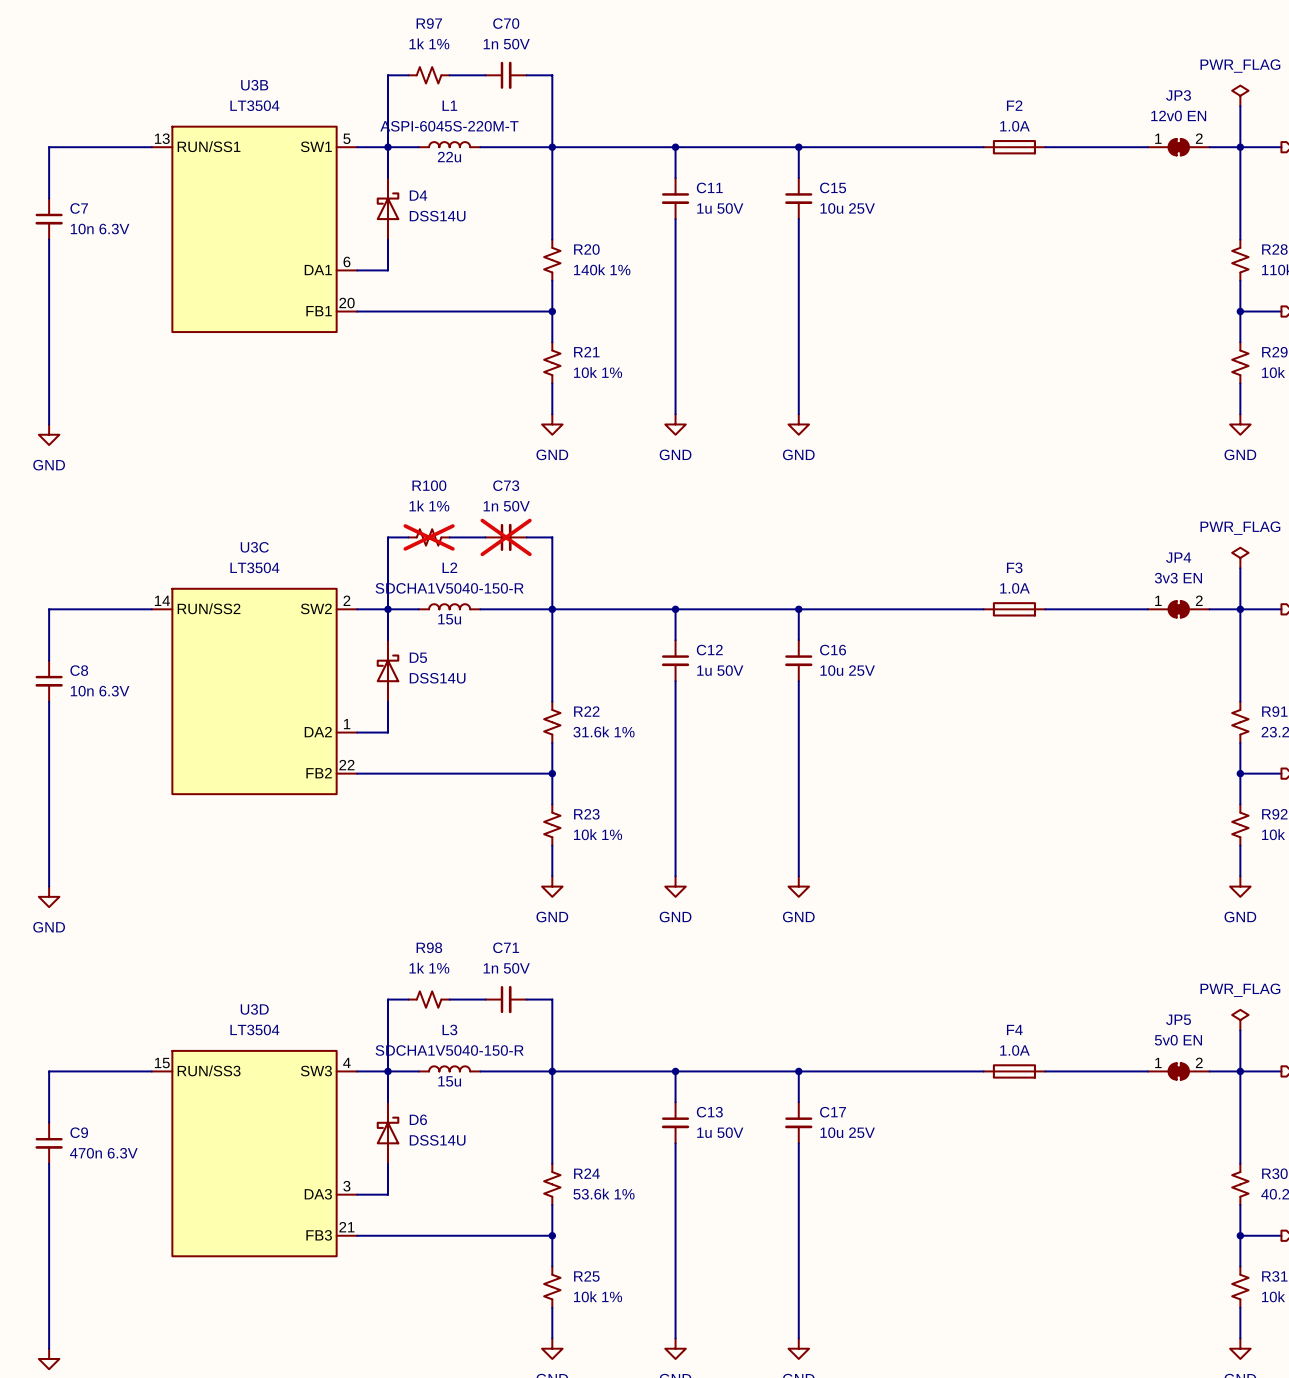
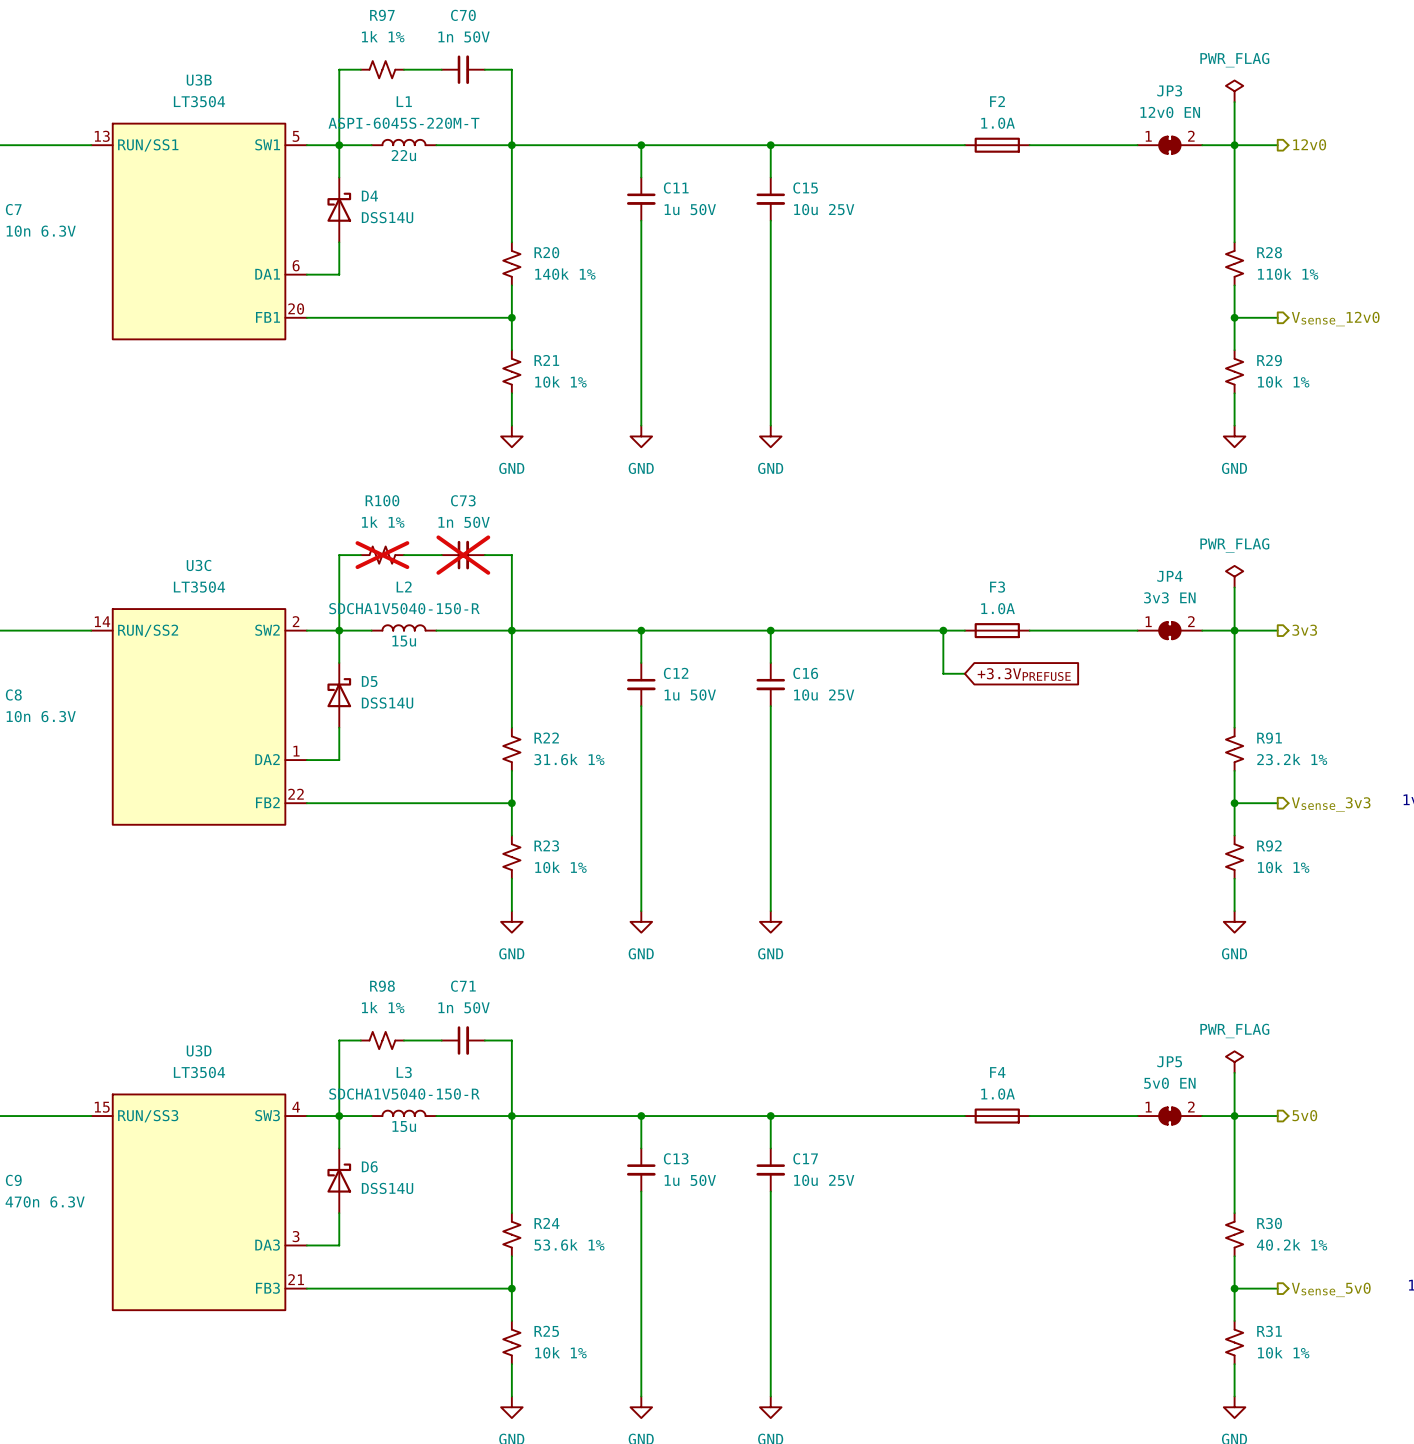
wire: none -> (943, 630) (943, 673) (964, 673)
junction: none -> (943, 630)
global label: none -> +3.3VPREFUSE (1024, 674)

